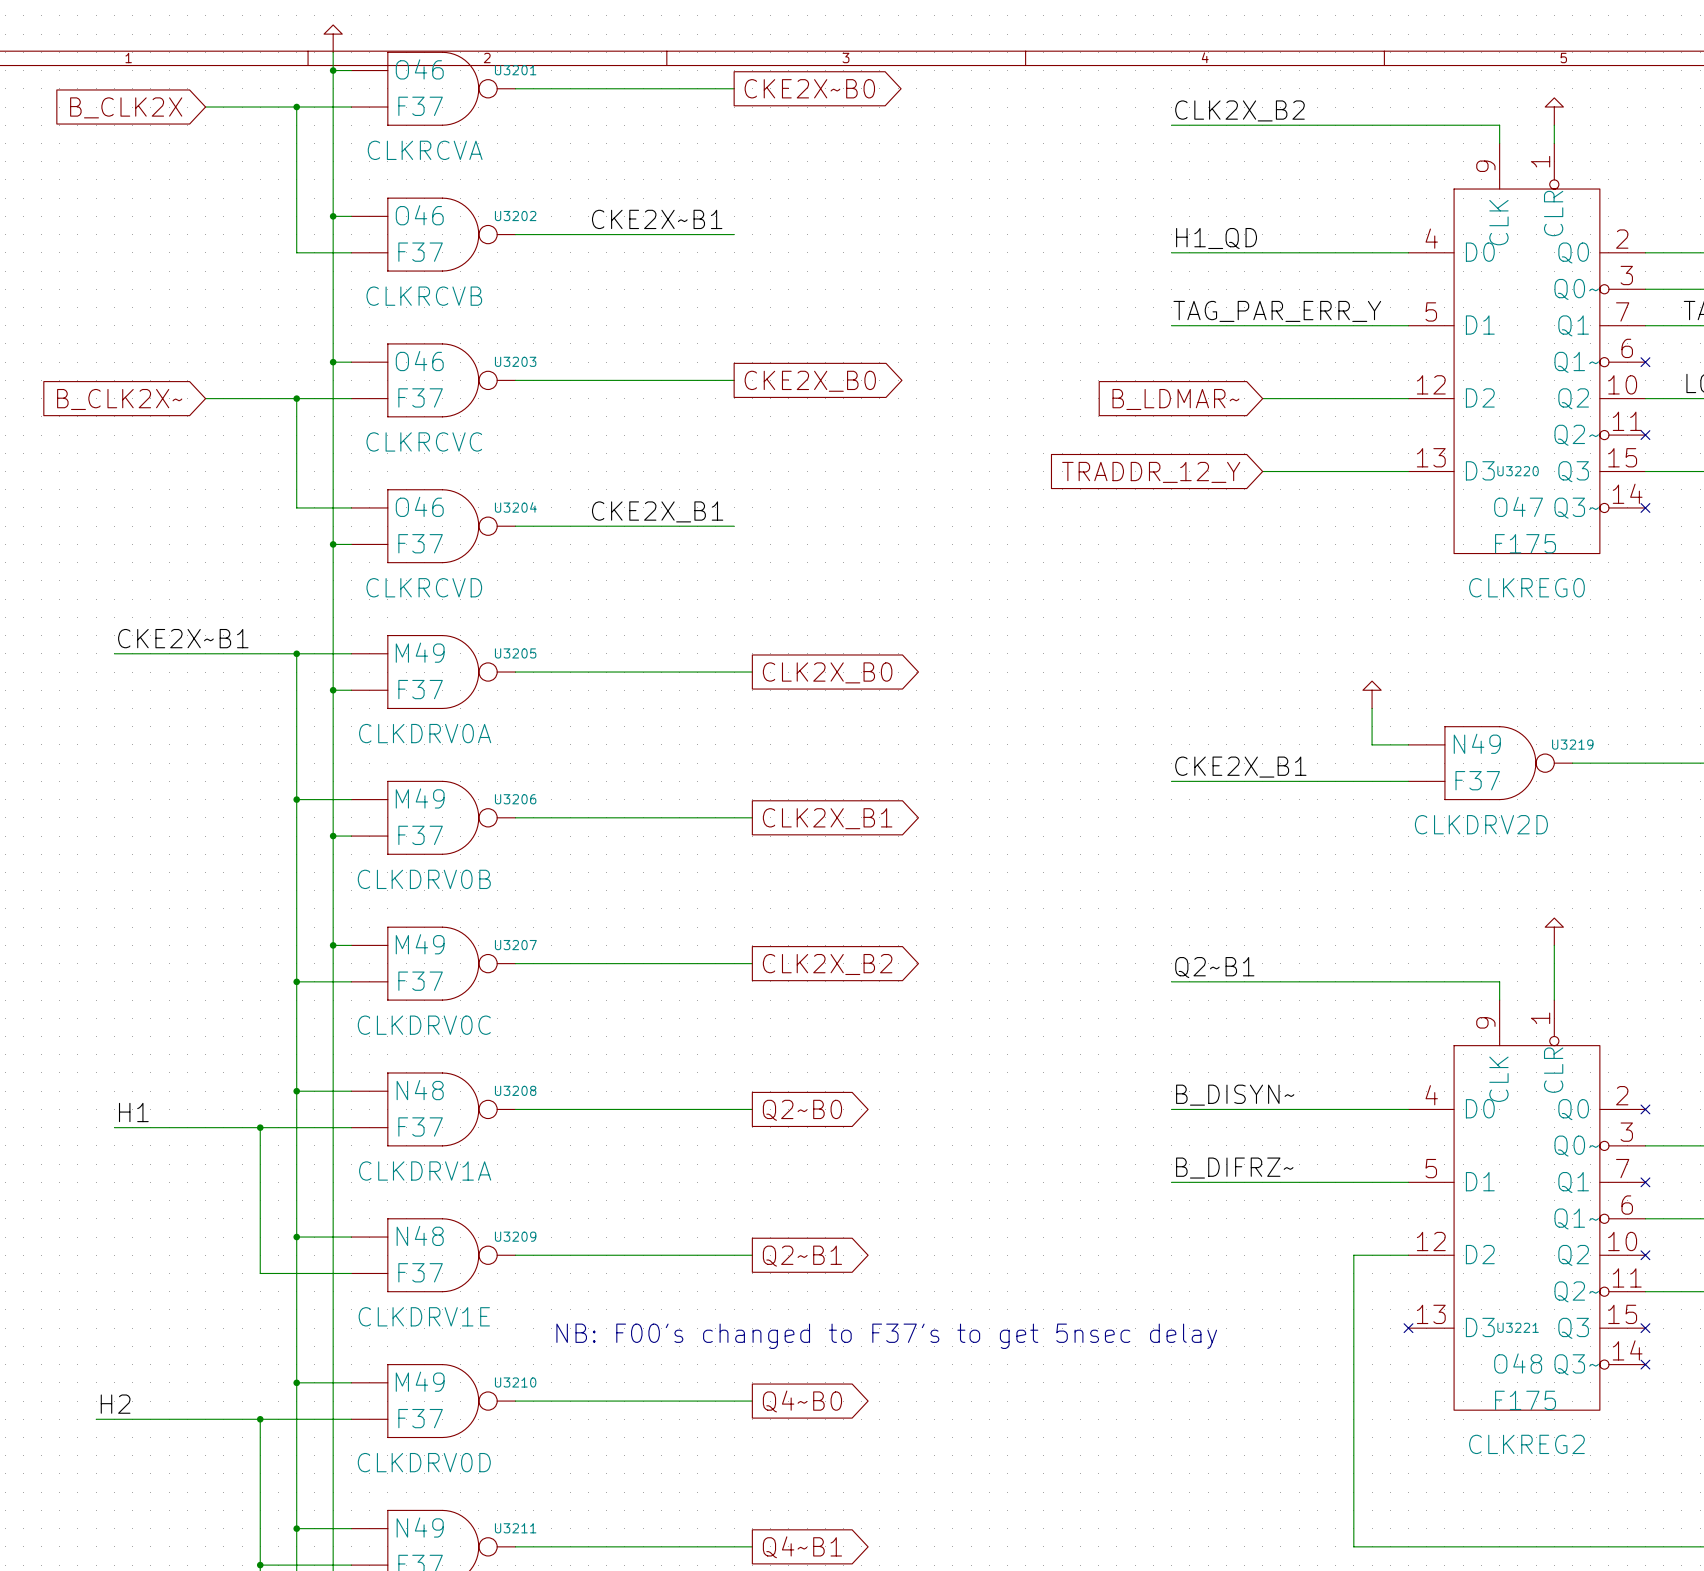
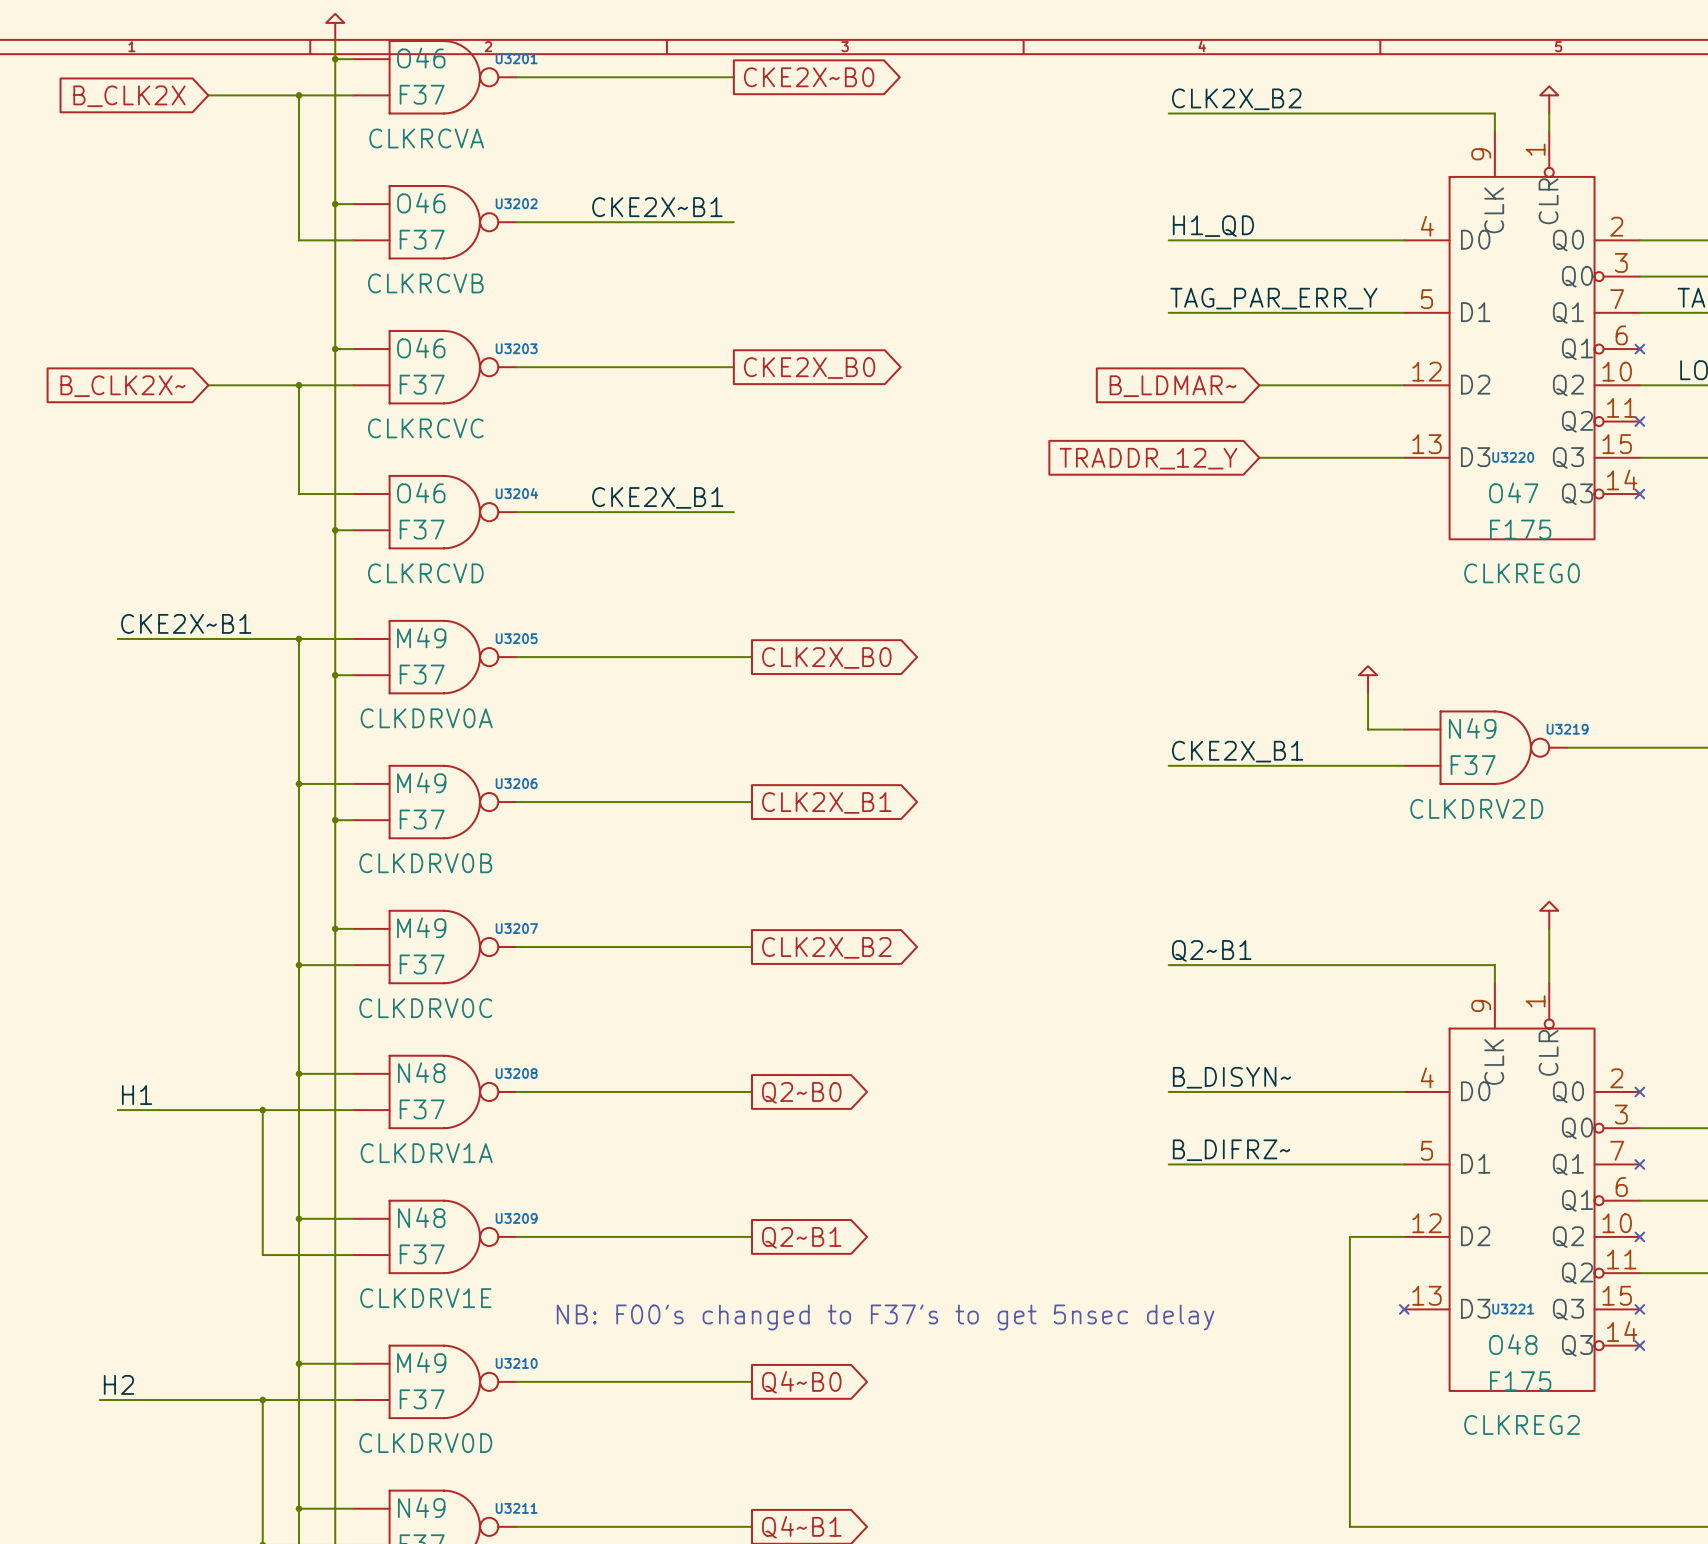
U3220 pin name: Q0~ (1576, 289) -> Q0 (1577, 276)
U3220 pin name: Q1~ (1576, 362) -> Q1 (1577, 349)
U3220 pin name: Q2~ (1576, 435) -> Q2 (1577, 421)
U3220 pin name: Q3~ (1576, 508) -> Q3 (1577, 494)
U3221 pin name: Q0~ (1576, 1146) -> Q0 (1577, 1128)
U3221 pin name: Q1~ (1576, 1218) -> Q1 (1577, 1200)
U3221 pin name: Q2~ (1576, 1291) -> Q2 (1577, 1273)
U3221 pin name: Q3~ (1576, 1364) -> Q3 (1577, 1345)

